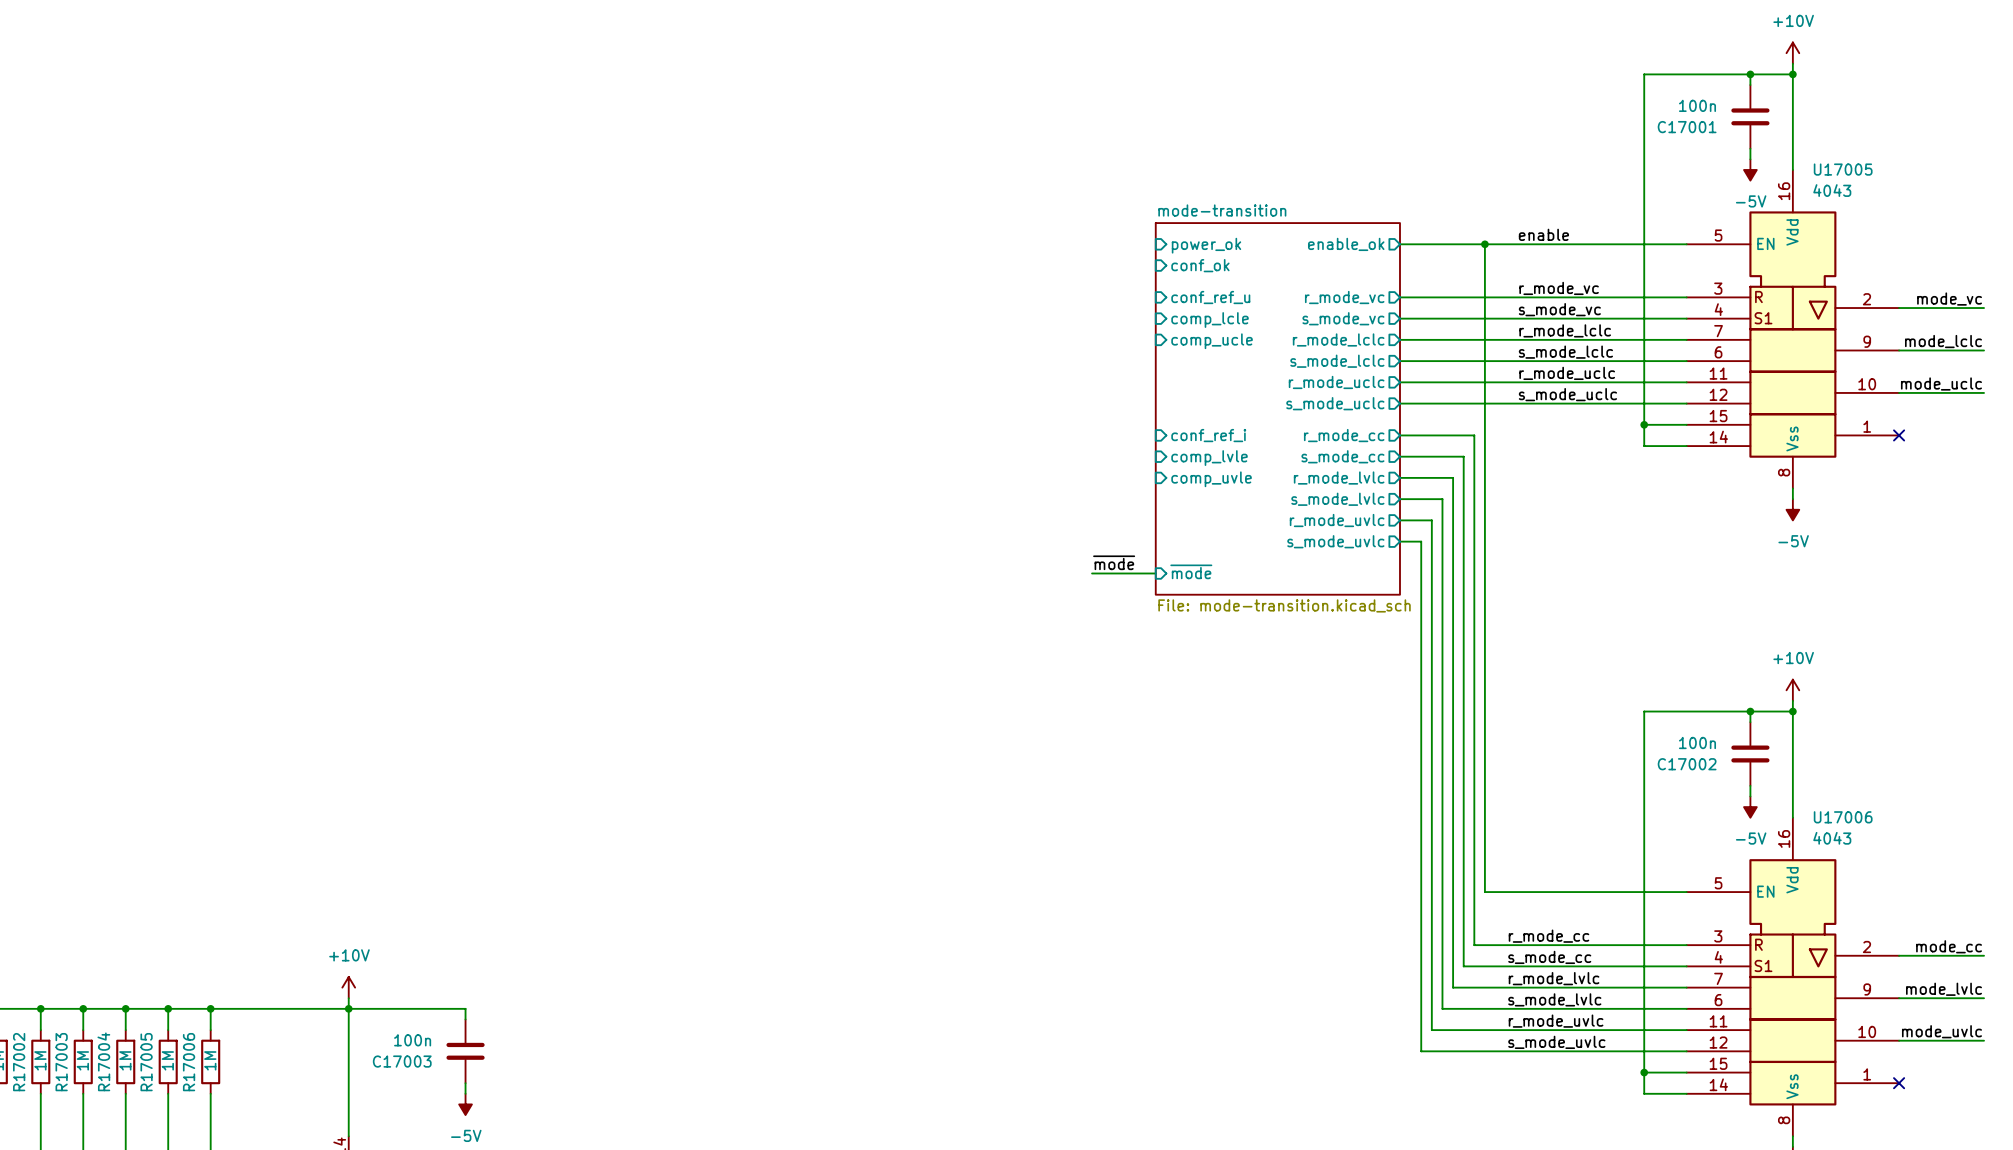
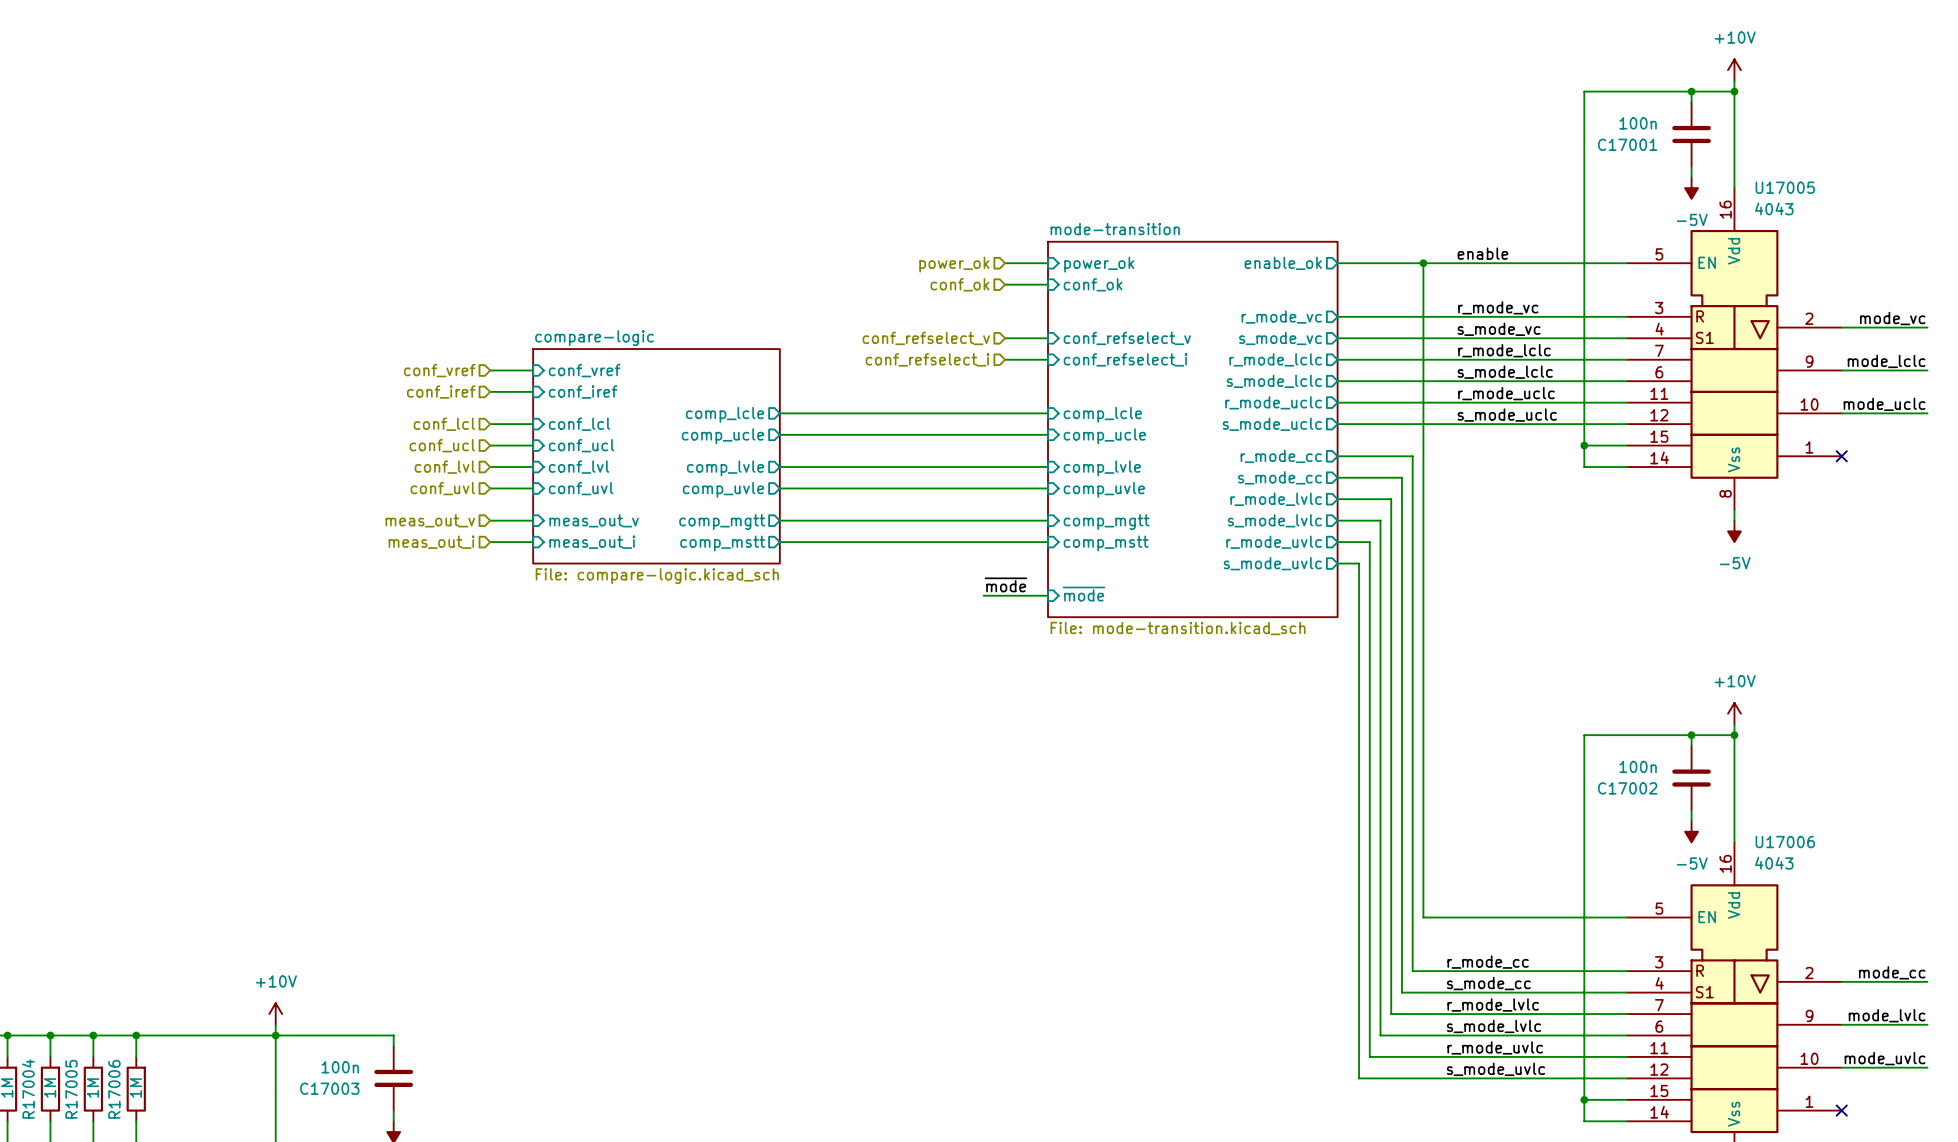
wire: none -> (1005, 263) (1047, 263)
hierarchical label: none -> power_ok (954, 264)
sheet pin position: power_ok (1206, 245) -> power_ok (1099, 264)
hierarchical label: none -> conf_ok (959, 284)
wire: none -> (1005, 284) (1047, 284)
sheet pin position: conf_ok (1200, 265) -> conf_ok (1093, 284)
sheet pin: conf_ref_u (1210, 297) -> conf_refselect_v (1127, 338)
hierarchical label: none -> conf_refselect_v (926, 338)
wire: none -> (1005, 338) (1047, 338)
sheet pin position: comp_lcle (1210, 320) -> comp_lcle (1102, 414)
hierarchical label: none -> conf_refselect_i (927, 359)
wire: none -> (1005, 359) (1047, 359)
sheet pin: none -> conf_refselect_i (1125, 359)
sheet pin position: comp_ucle (1212, 341) -> comp_ucle (1104, 436)
hierarchical label: none -> conf_vref (439, 370)
wire: none -> (490, 370) (533, 370)
sheet pin: none -> conf_vref (584, 370)
hierarchical label: none -> conf_iref (441, 392)
wire: none -> (490, 391) (533, 391)
sheet pin: none -> conf_iref (583, 392)
wire: none -> (779, 413) (1047, 413)
sheet pin: none -> comp_lcle (725, 414)
hierarchical label: none -> conf_lcl (444, 424)
wire: none -> (490, 424) (533, 424)
sheet pin: none -> conf_lcl (579, 424)
sheet mode-transition: none -> File: mode-transition.kicad_sch (1192, 429)
sheet mode-transition: File: mode-transition.kicad_sch (1277, 408) -> none
wire: none -> (779, 434) (1047, 434)
sheet pin: none -> comp_ucle (722, 436)
hierarchical label: none -> conf_ucl (442, 445)
wire: none -> (490, 445) (533, 445)
sheet pin: none -> conf_ucl (581, 445)
sheet compare-logic: none -> File: compare-logic.kicad_sch (656, 456)
sheet pin: conf_ref_i (1208, 435) -> none
hierarchical label: none -> conf_lvl (444, 467)
wire: none -> (490, 467) (533, 467)
sheet pin: none -> conf_lvl (579, 467)
wire: none -> (779, 467) (1047, 467)
sheet pin: none -> comp_lvle (725, 468)
sheet pin position: comp_lvle (1209, 458) -> comp_lvle (1102, 468)
hierarchical label: none -> conf_uvl (442, 488)
wire: none -> (490, 488) (533, 488)
sheet pin: none -> conf_uvl (581, 488)
wire: none -> (779, 488) (1047, 488)
sheet pin: none -> comp_uvle (723, 489)
sheet pin position: comp_uvle (1211, 479) -> comp_uvle (1104, 489)
hierarchical label: none -> meas_out_v (430, 520)
wire: none -> (490, 520) (533, 520)
sheet pin: none -> meas_out_v (594, 520)
wire: none -> (779, 520) (1047, 520)
sheet pin: none -> comp_mgtt (722, 522)
sheet pin: none -> comp_mgtt (1106, 522)
hierarchical label: none -> meas_out_i (431, 542)
wire: none -> (490, 542) (533, 542)
sheet pin: none -> meas_out_i (592, 542)
wire: none -> (779, 542) (1047, 542)
sheet pin: none -> comp_mstt (722, 543)
sheet pin: none -> comp_mstt (1106, 543)
label position: ~{mode} (1114, 562) -> ~{mode} (1005, 584)
sheet pin position: ~{mode} (1191, 571) -> ~{mode} (1083, 594)
wire: (1113, 573) (1155, 573) -> (983, 595) (1026, 595)

